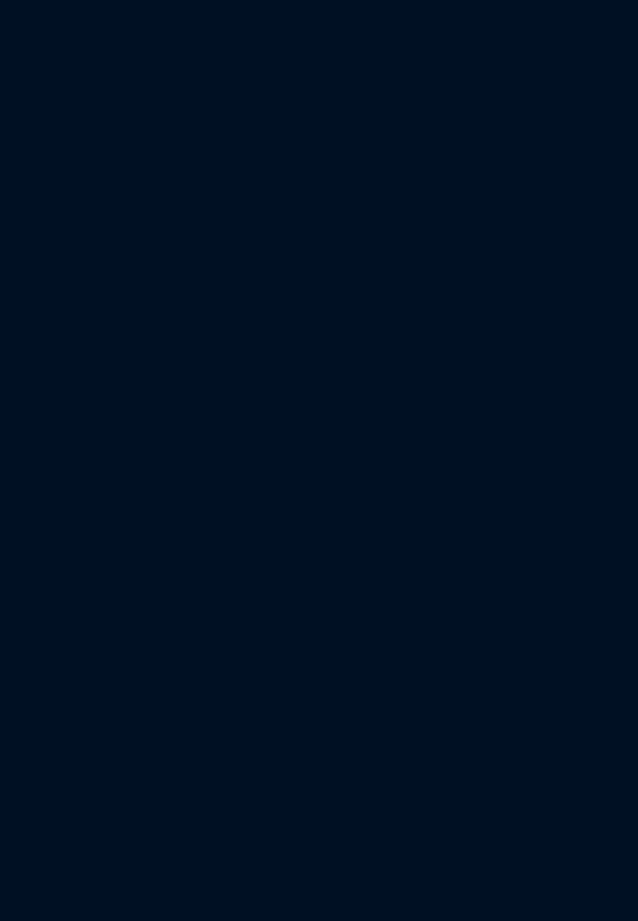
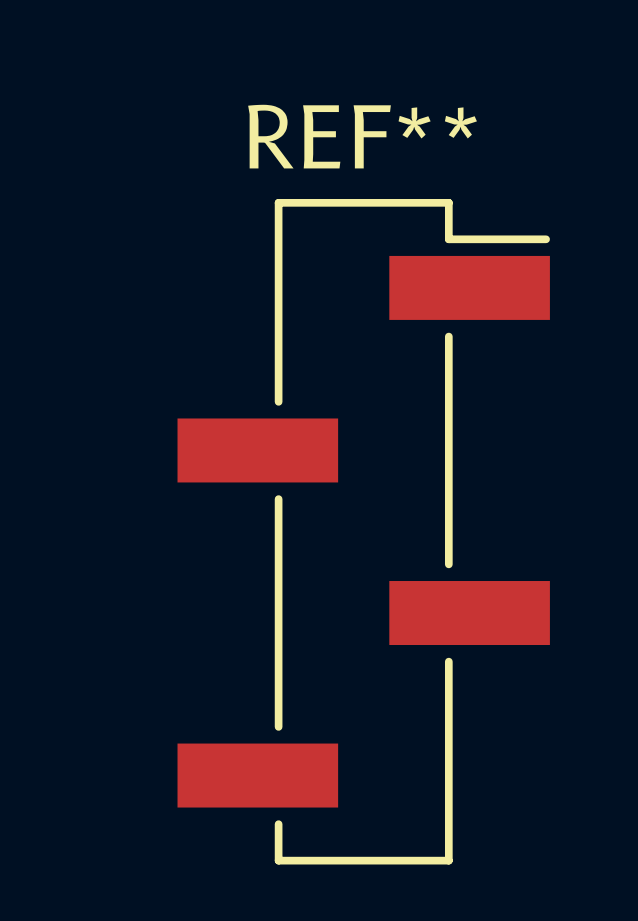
REF**: none -> (363, 531)

